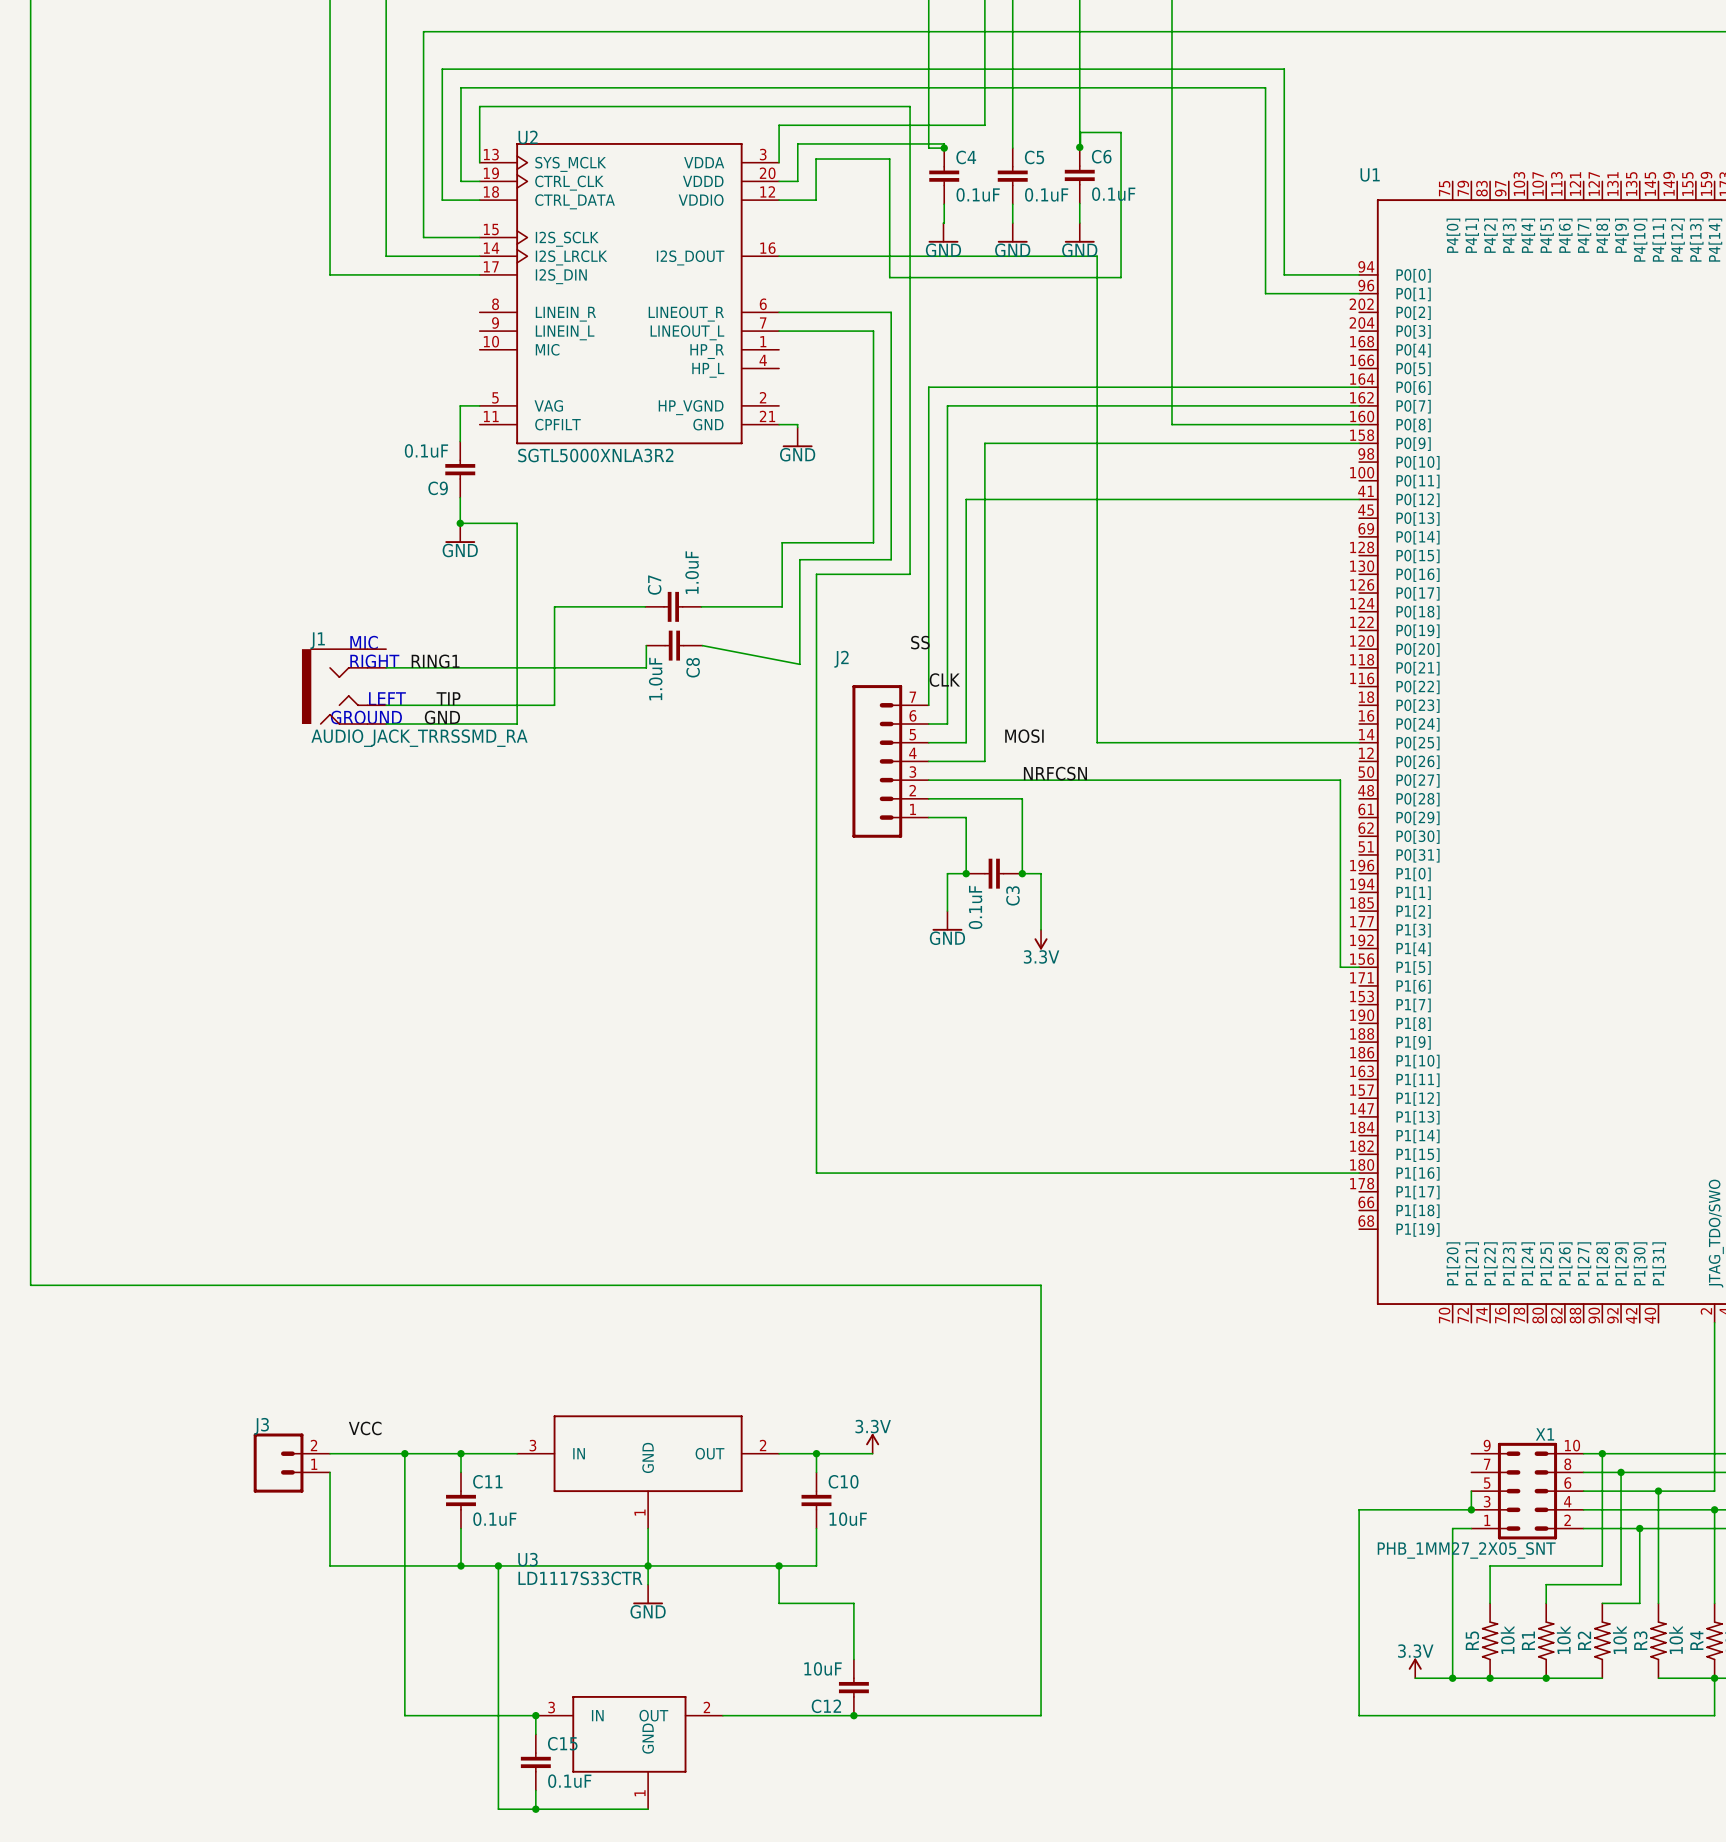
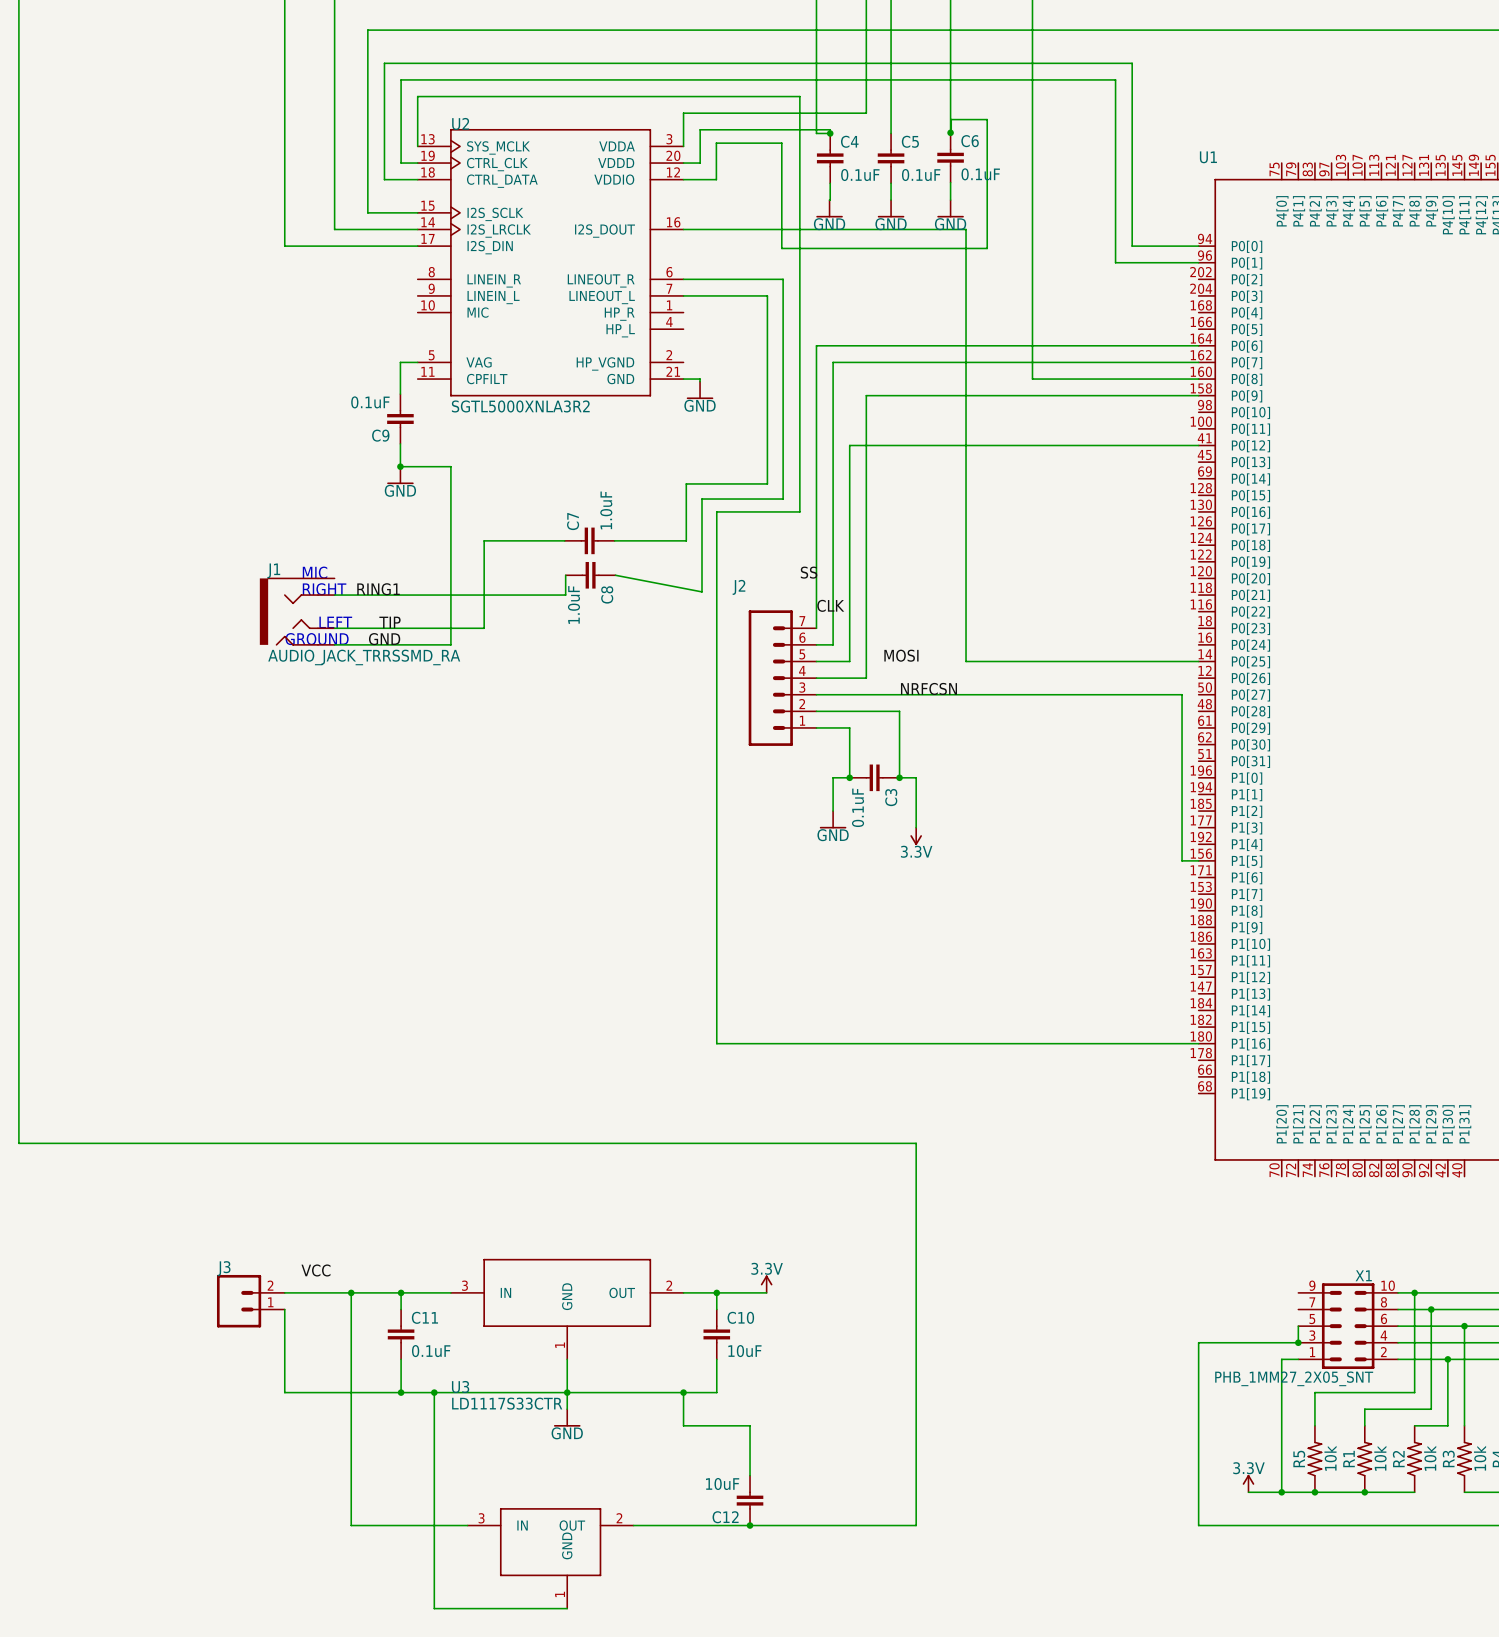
wire: (535, 1715) (535, 1734) -> none
junction: (535, 1715) -> none
C15: 0.1uF (535, 1762) -> none
wire: (535, 1790) (535, 1809) -> none
junction: (535, 1809) -> none

